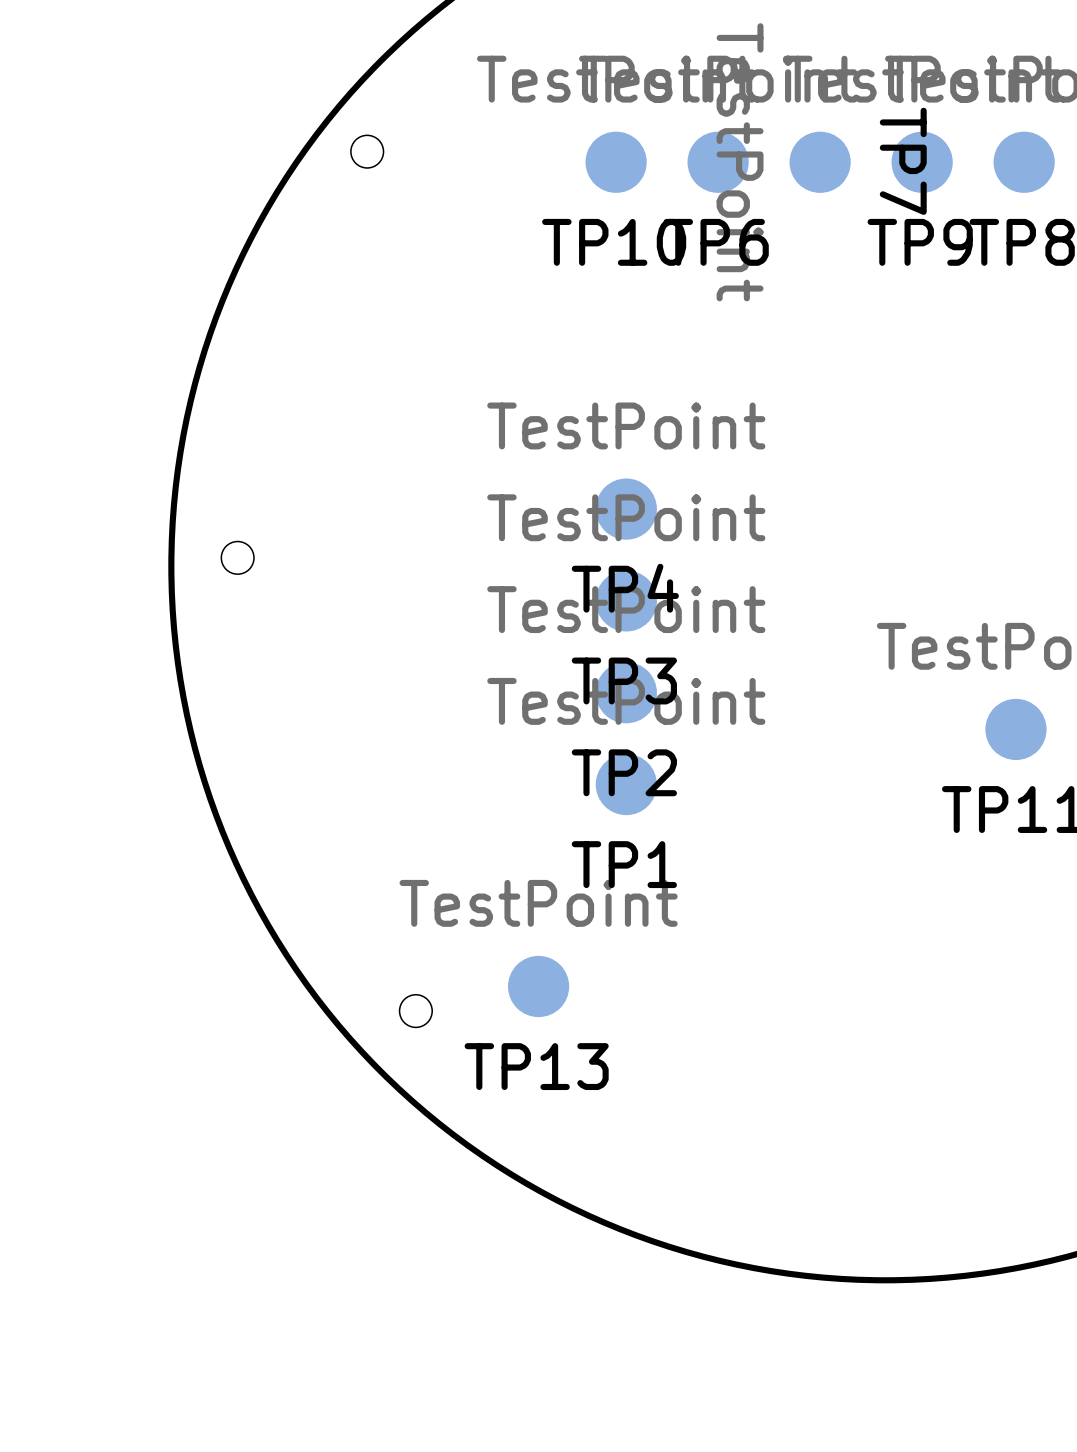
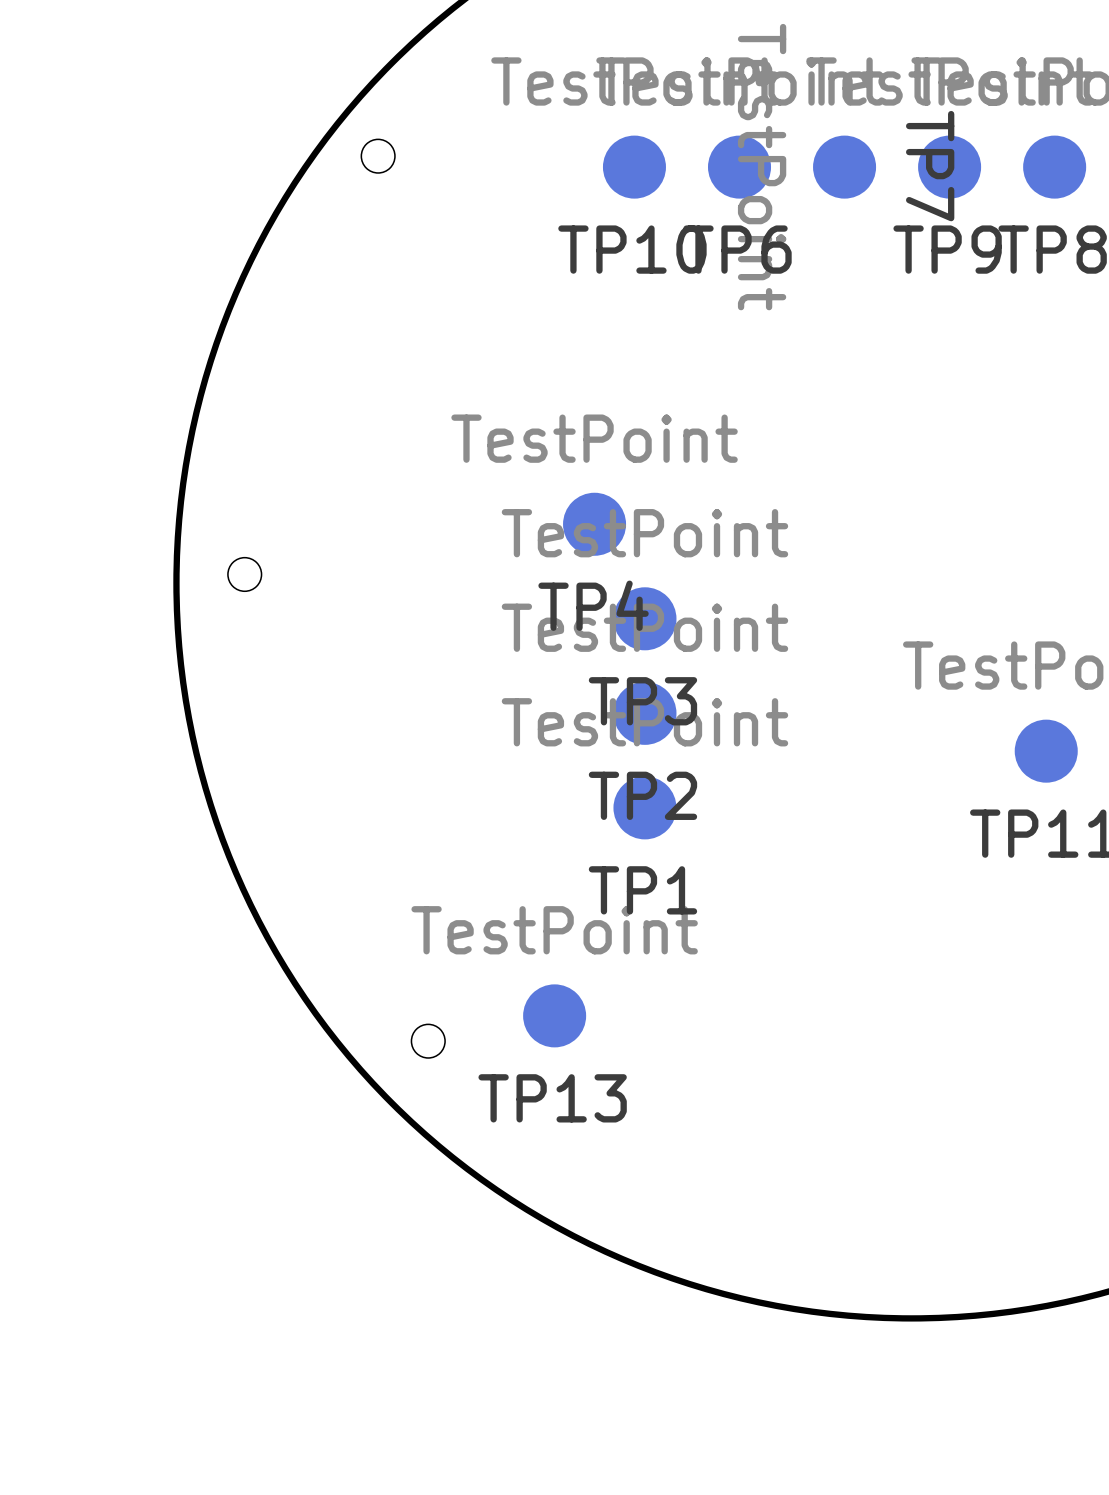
TP4 position: (626, 509) -> (594, 524)

